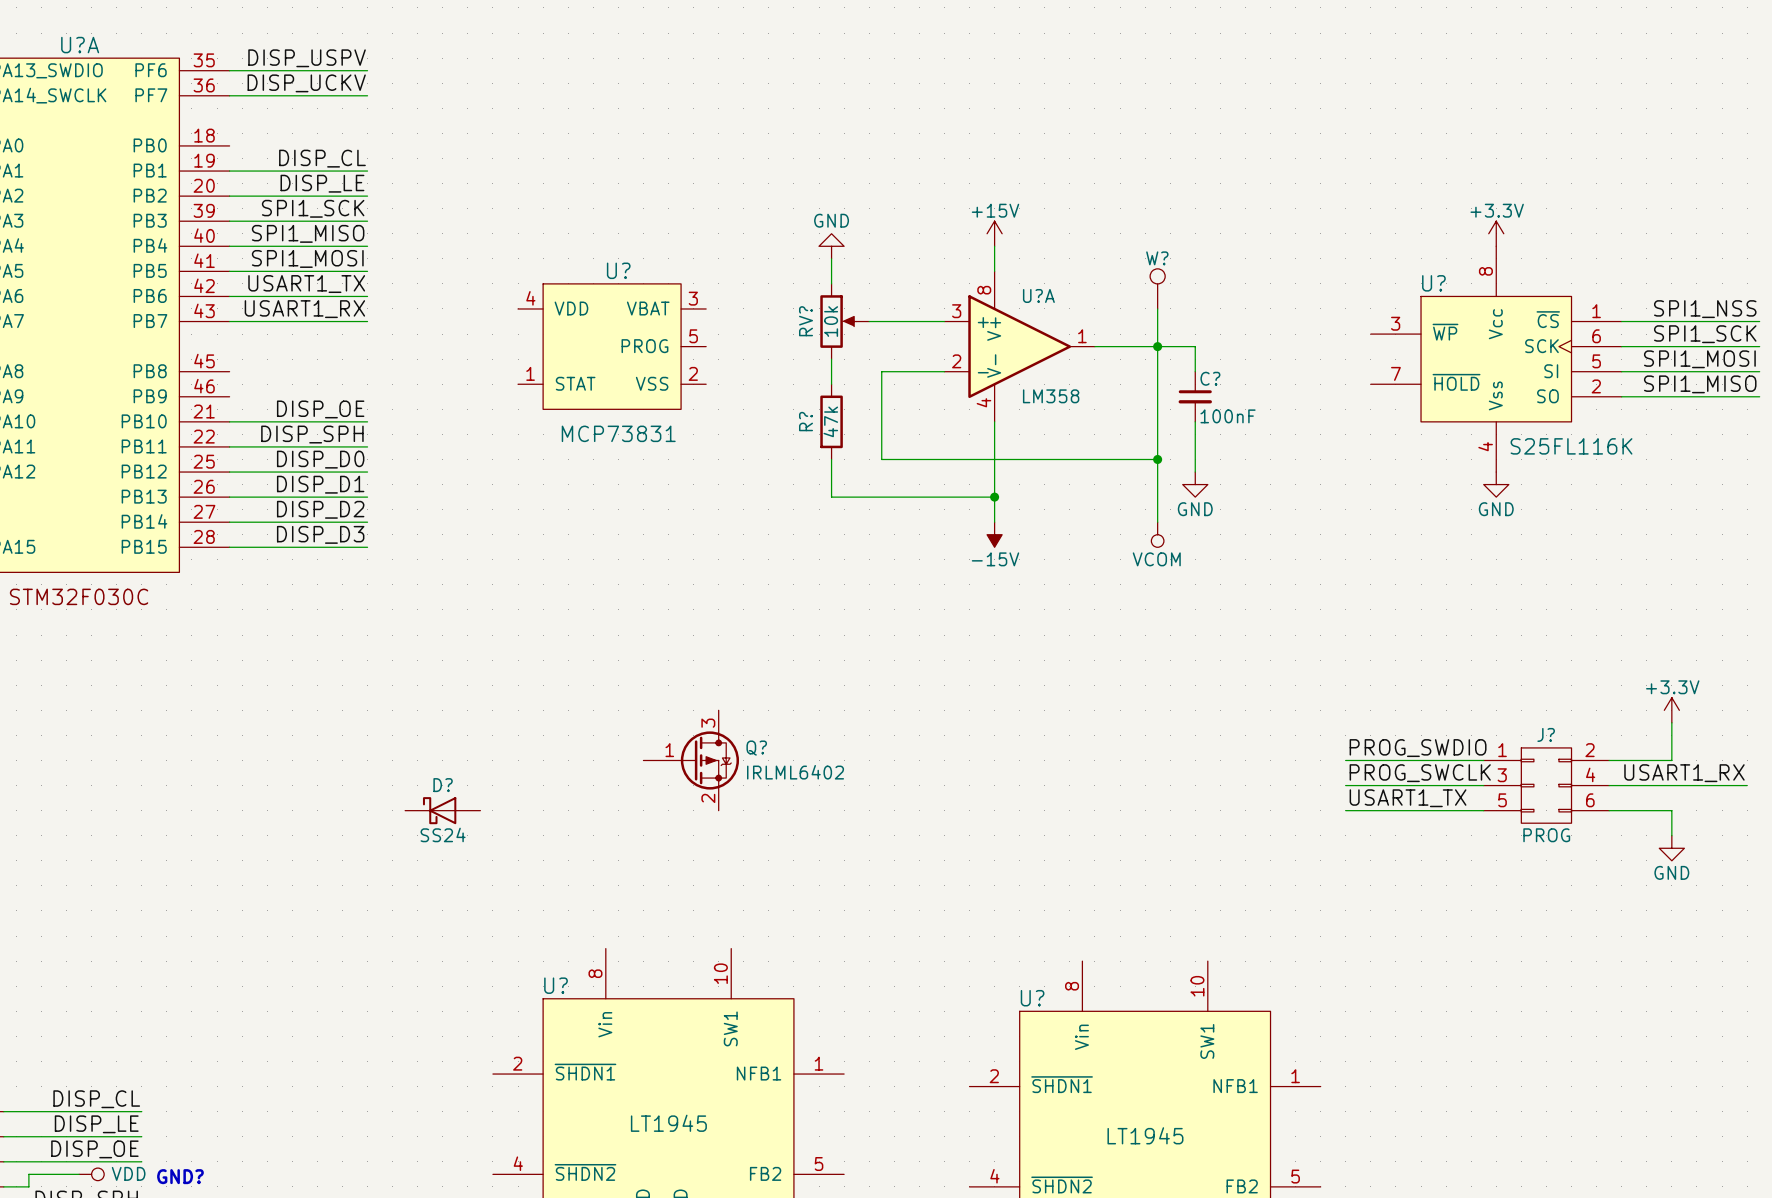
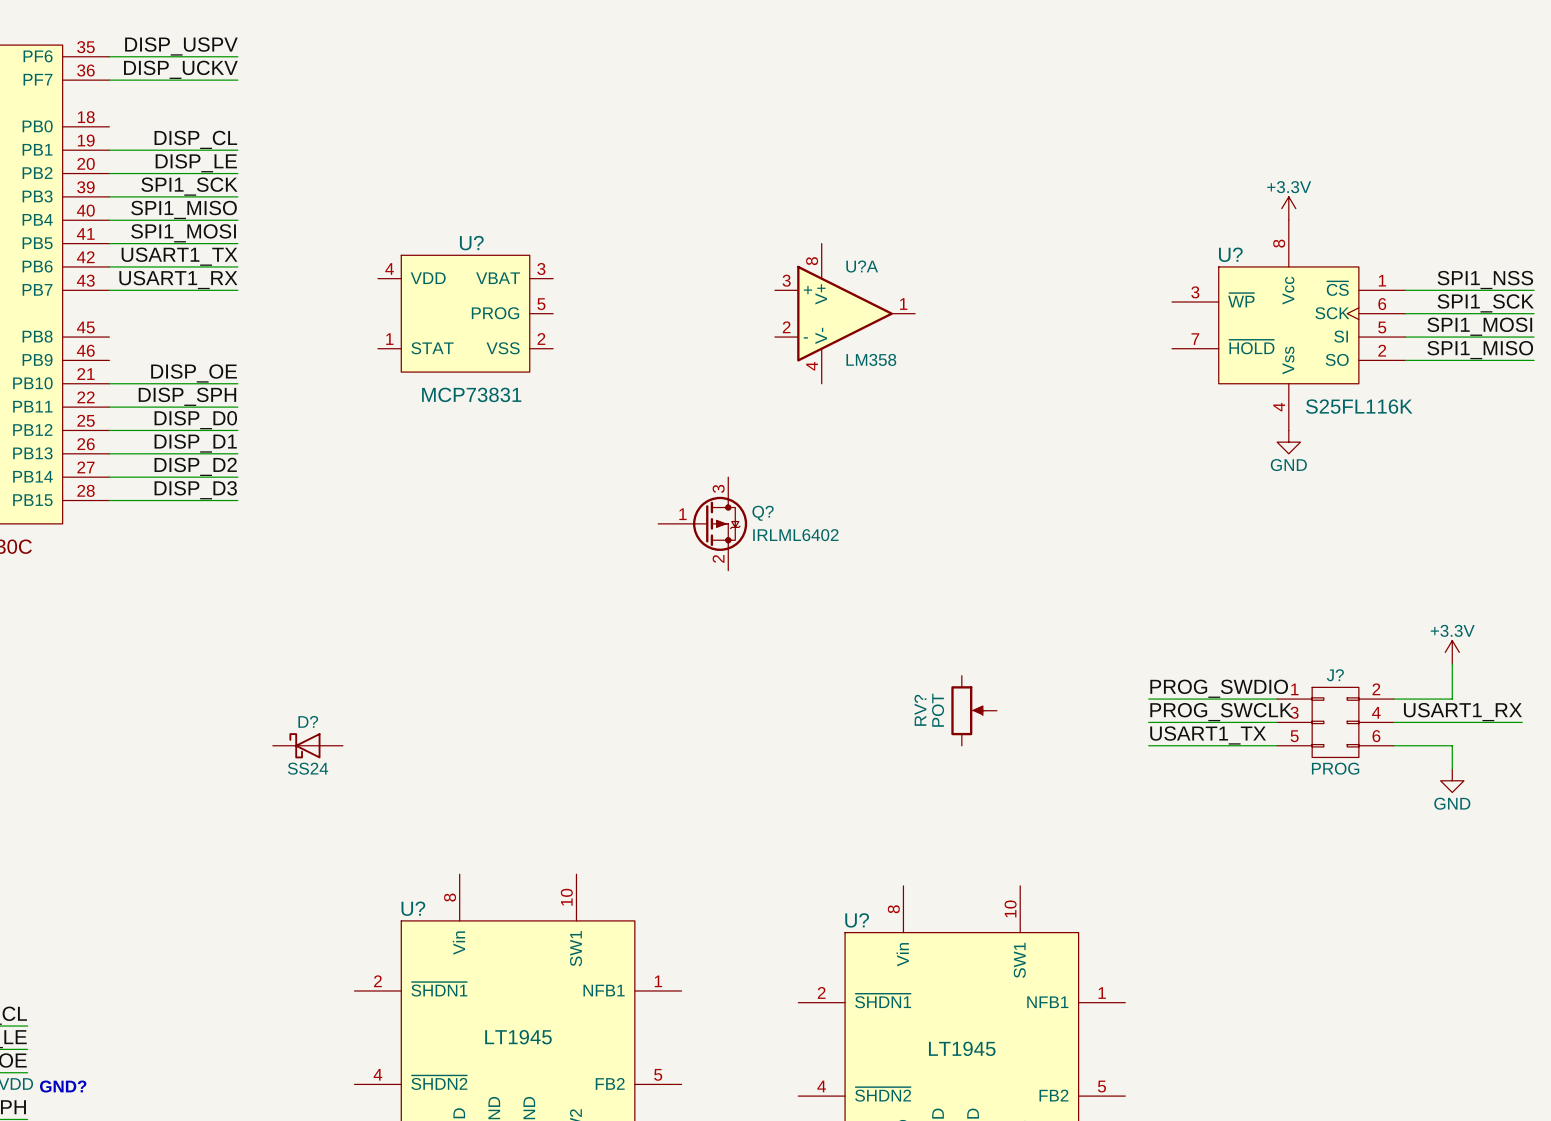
power symbol: +15V (994, 233) -> none
power symbol: GND (831, 246) -> none
wire: (994, 246) (994, 271) -> none
wire: (831, 258) (831, 283) -> none
W?: (1157, 288) -> none
wire: (1157, 308) (1157, 522) -> none
RV?: 10k (844, 321) -> none
wire: (869, 321) (944, 321) -> none
wire: (1094, 346) (1195, 346) (1195, 371) -> none
junction: (1157, 346) -> none
wire: (831, 359) (831, 384) -> none
wire: (944, 371) (881, 371) (881, 459) (1157, 459) -> none
C?: 100nF (1195, 396) -> none
R?: 47k (831, 421) -> none
wire: (994, 421) (994, 522) -> none
wire: (1195, 421) (1195, 472) -> none
wire: (831, 459) (831, 497) (994, 497) -> none
junction: (1157, 459) -> none
power symbol: GND (1195, 484) -> none
junction: (994, 497) -> none
power symbol: -15V (994, 534) -> none
power symbol: VCOM (1157, 534) -> none
Q?: none -> IRLML6402 (702, 523)
Q?: IRLML6402 (691, 760) -> none
RV?: none -> POT (974, 710)

